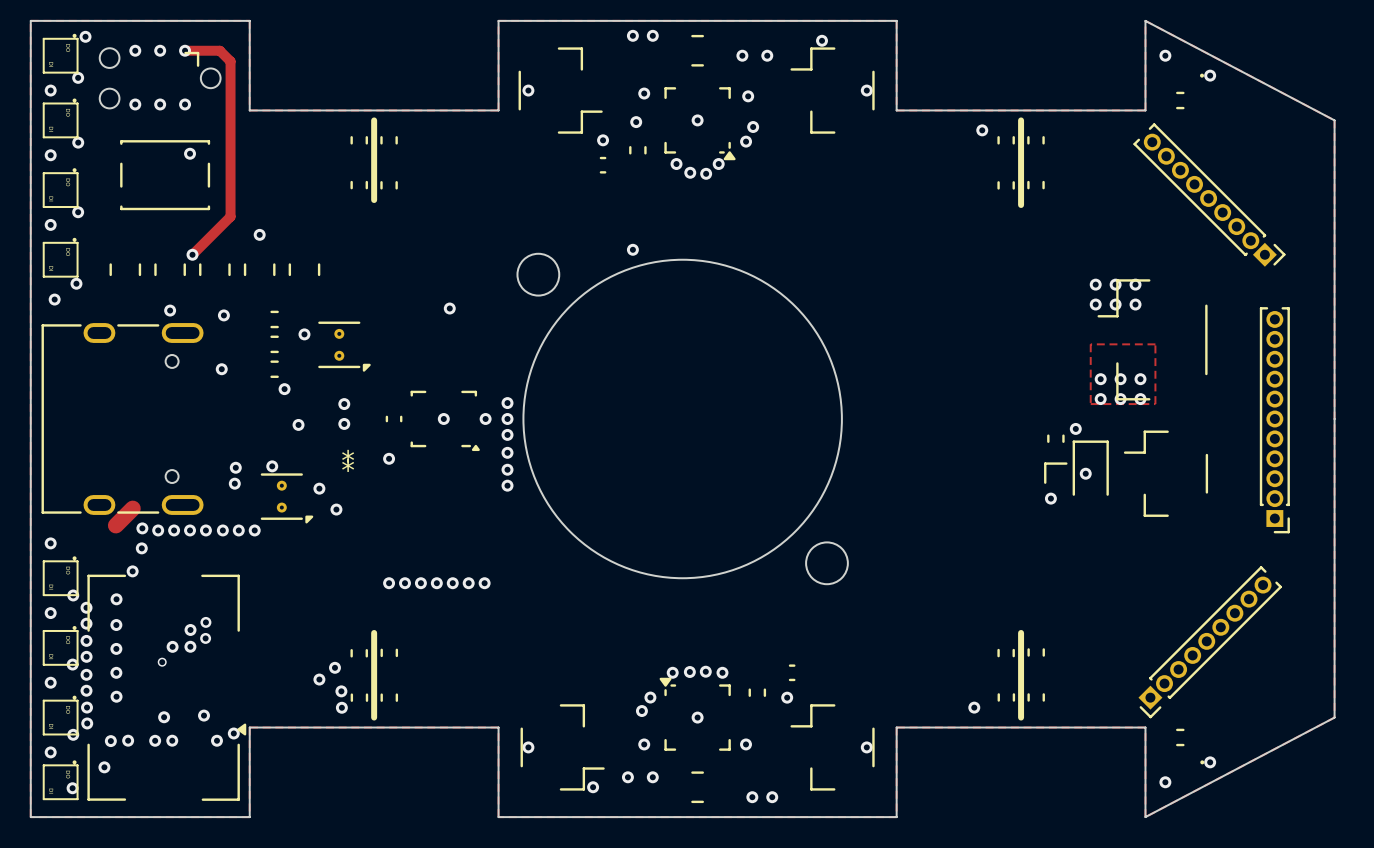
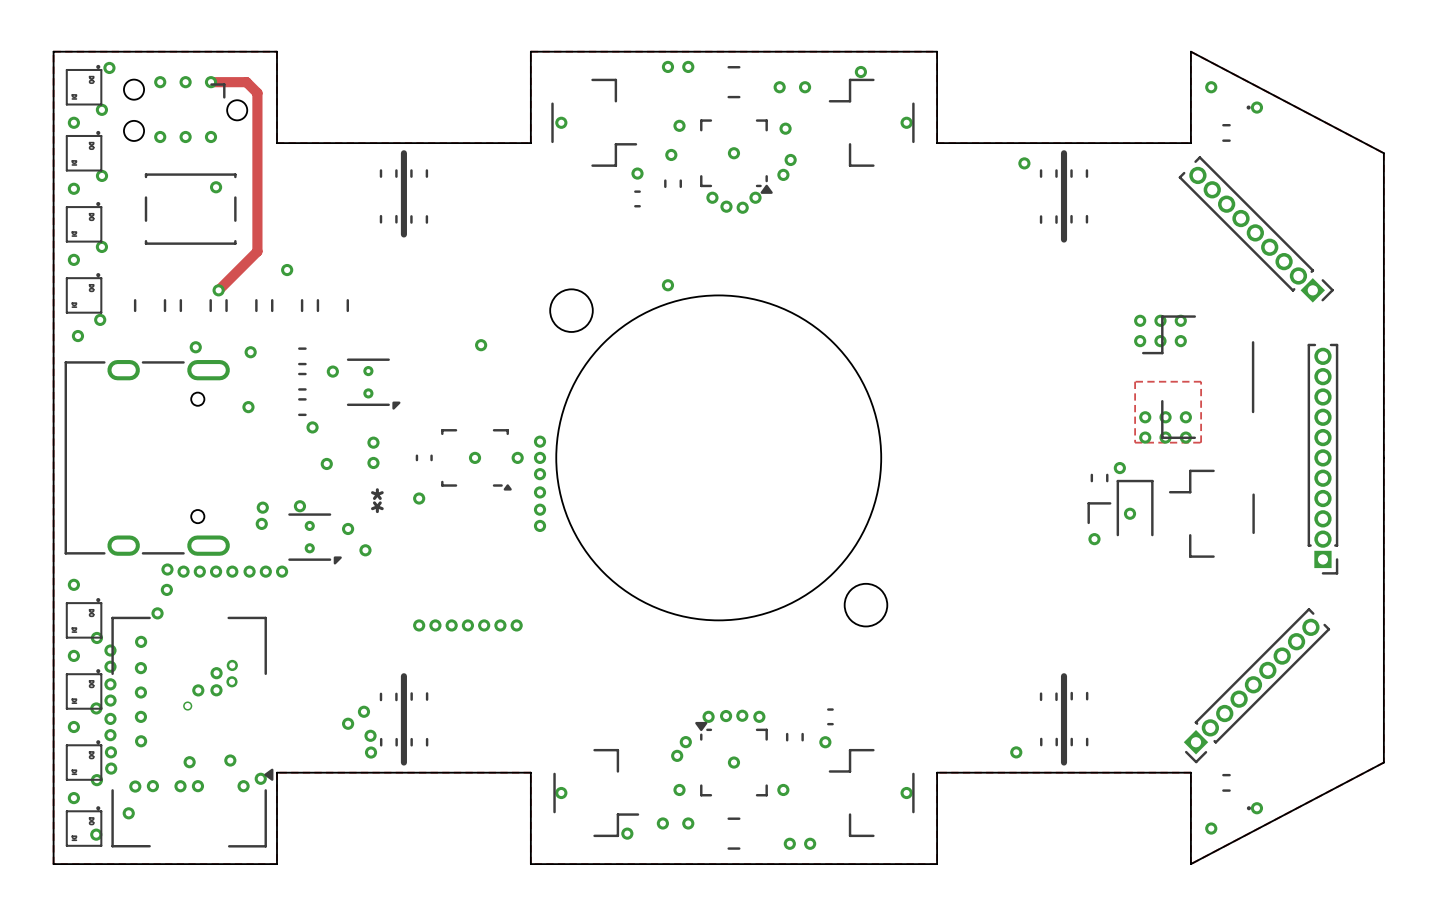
track: (132, 508) (115, 525) -> none

